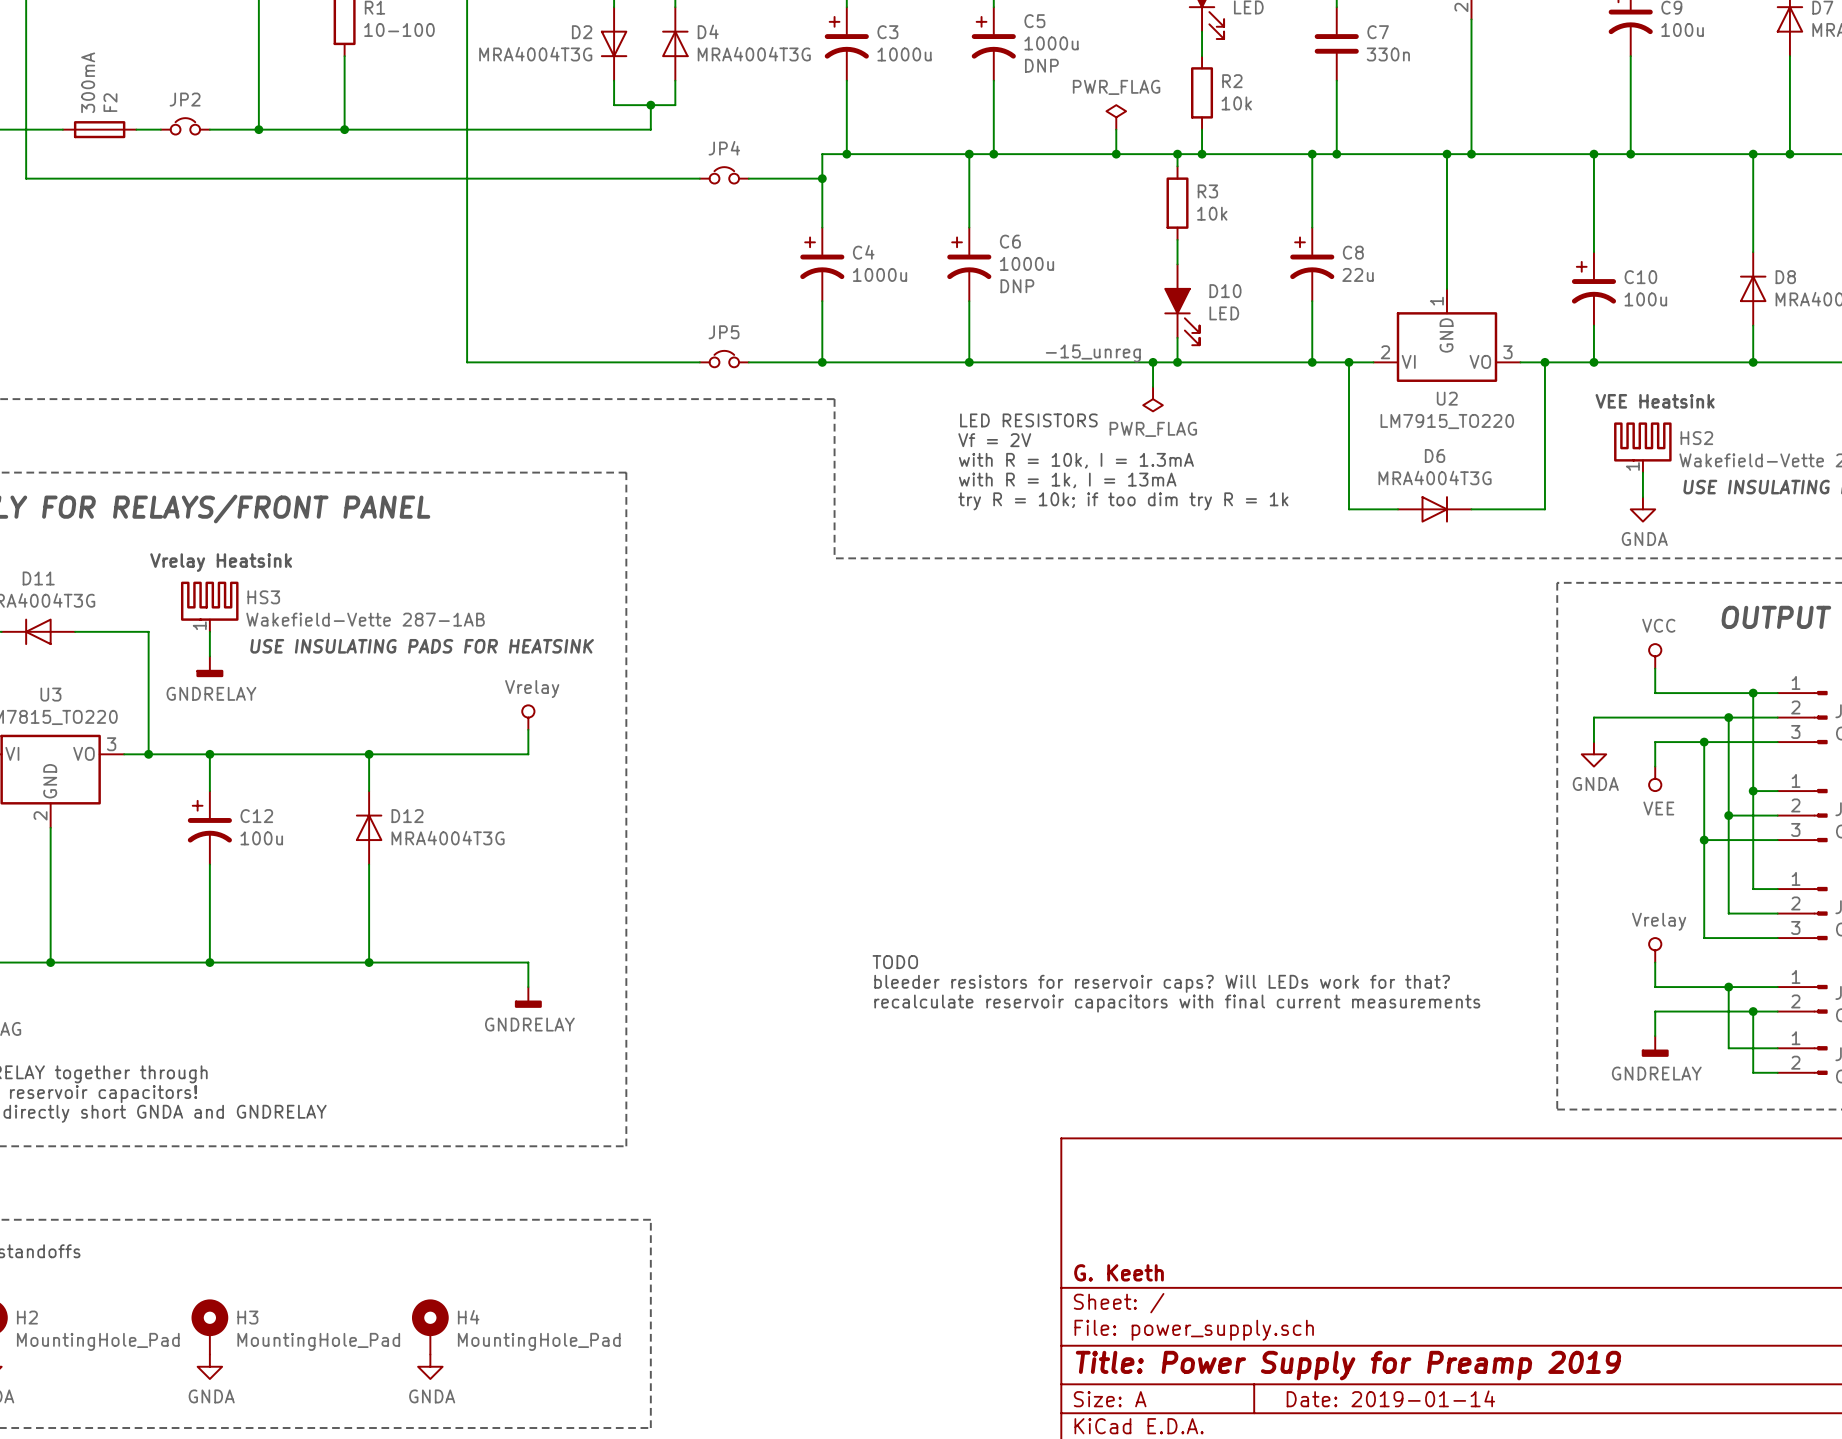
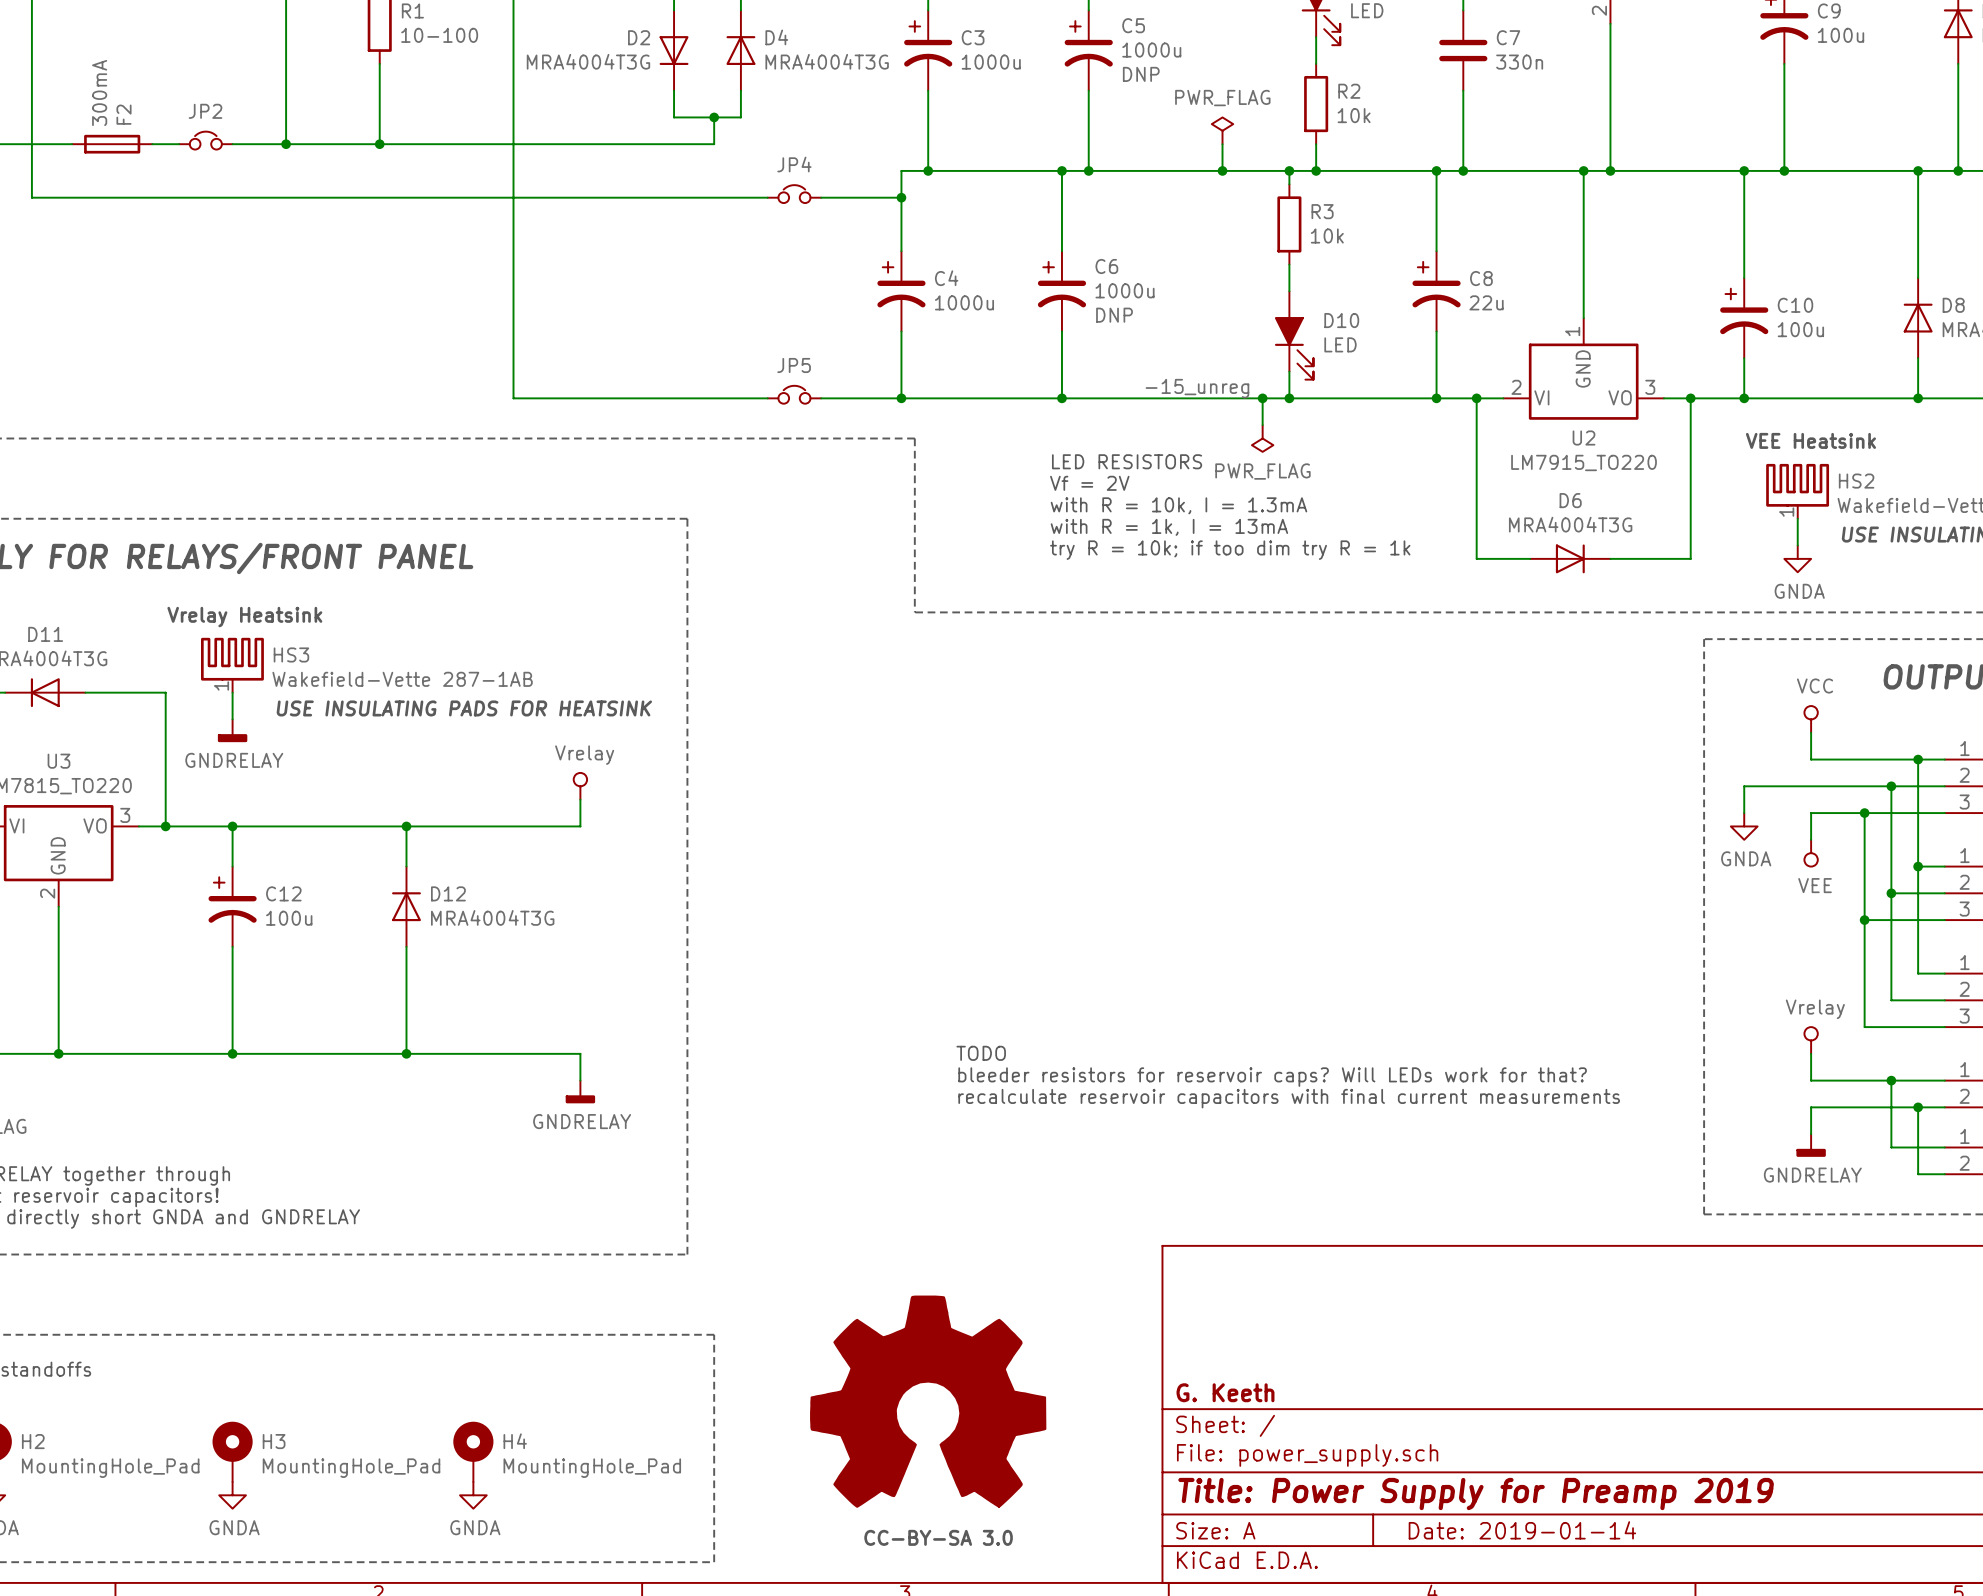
power symbol: none -> (928, 1401)
text: none -> CC-BY-SA 3.0 (938, 1537)

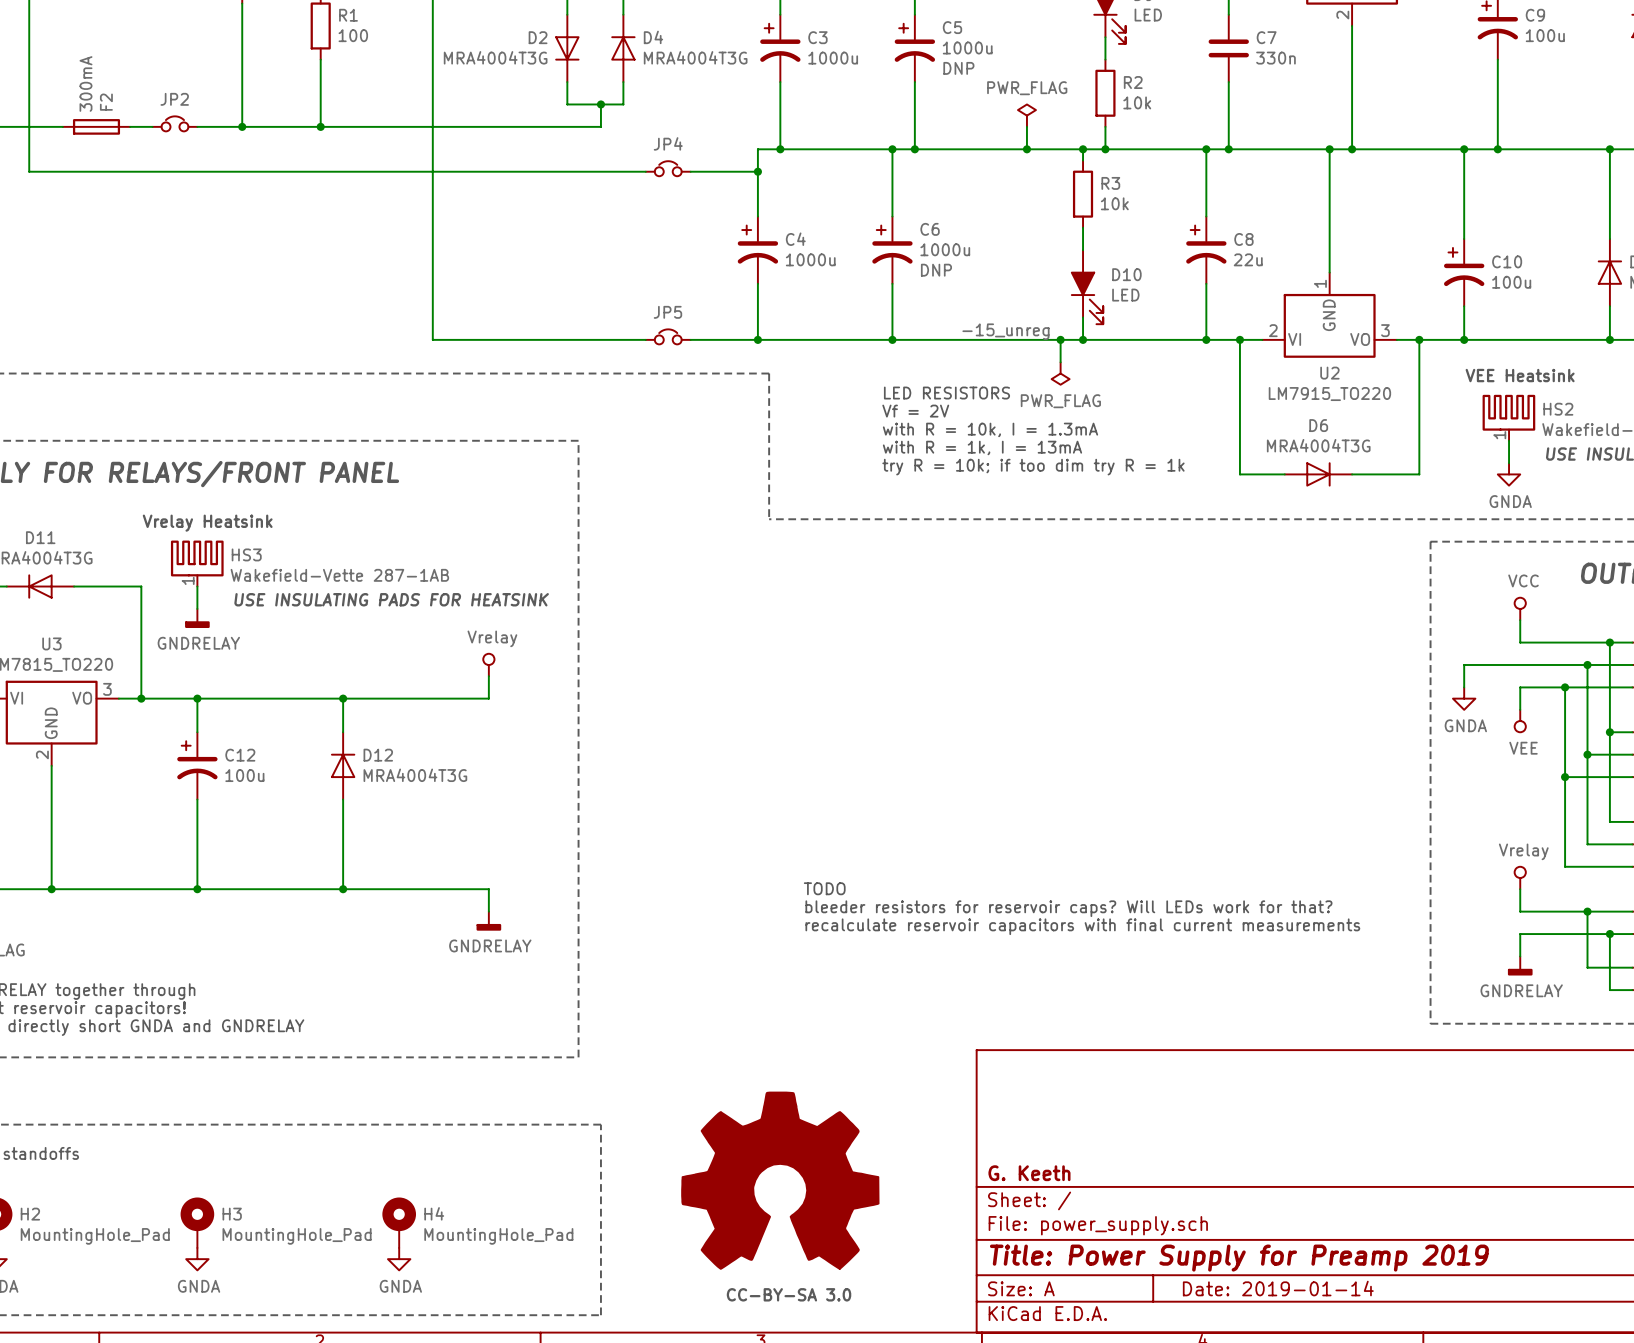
R1 value: 10-100 (439, 35) -> 100 (353, 35)

